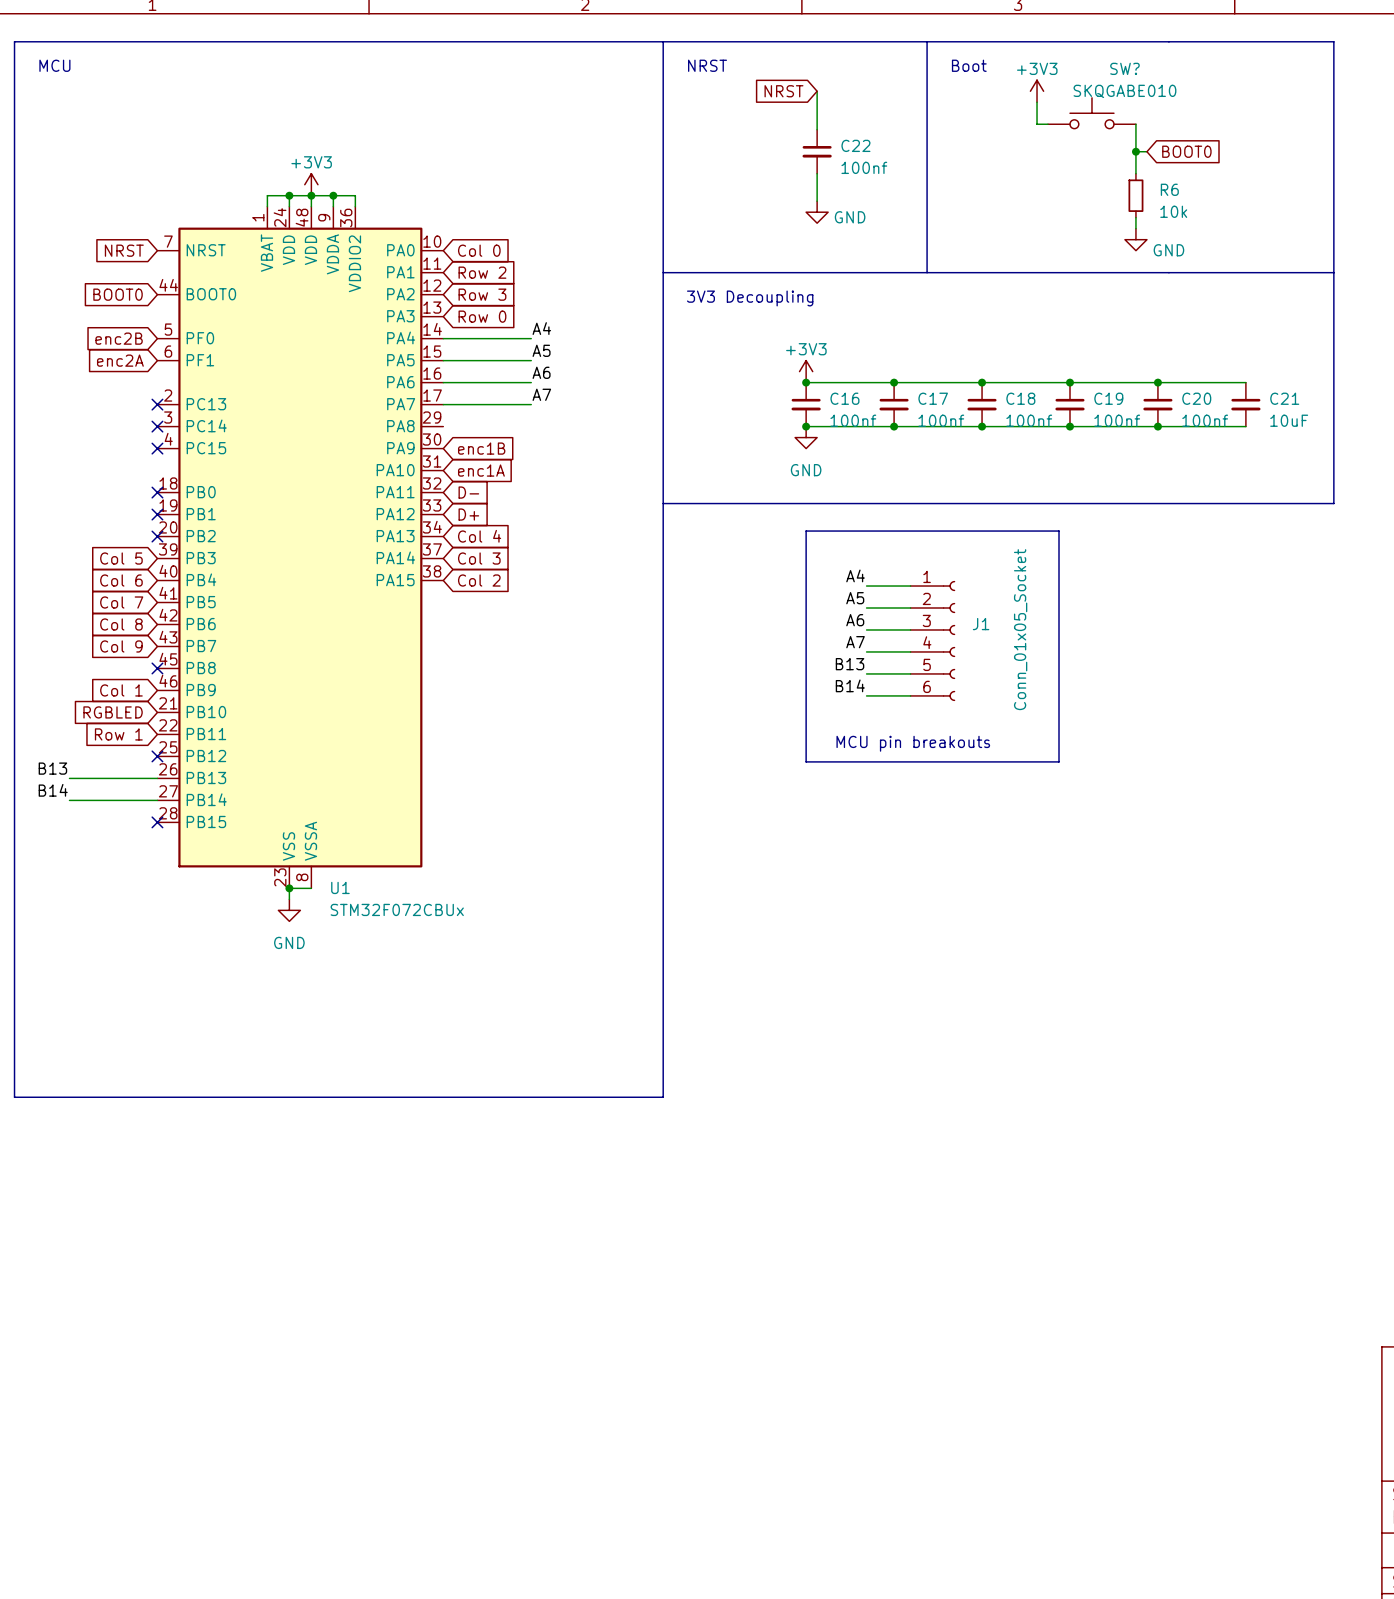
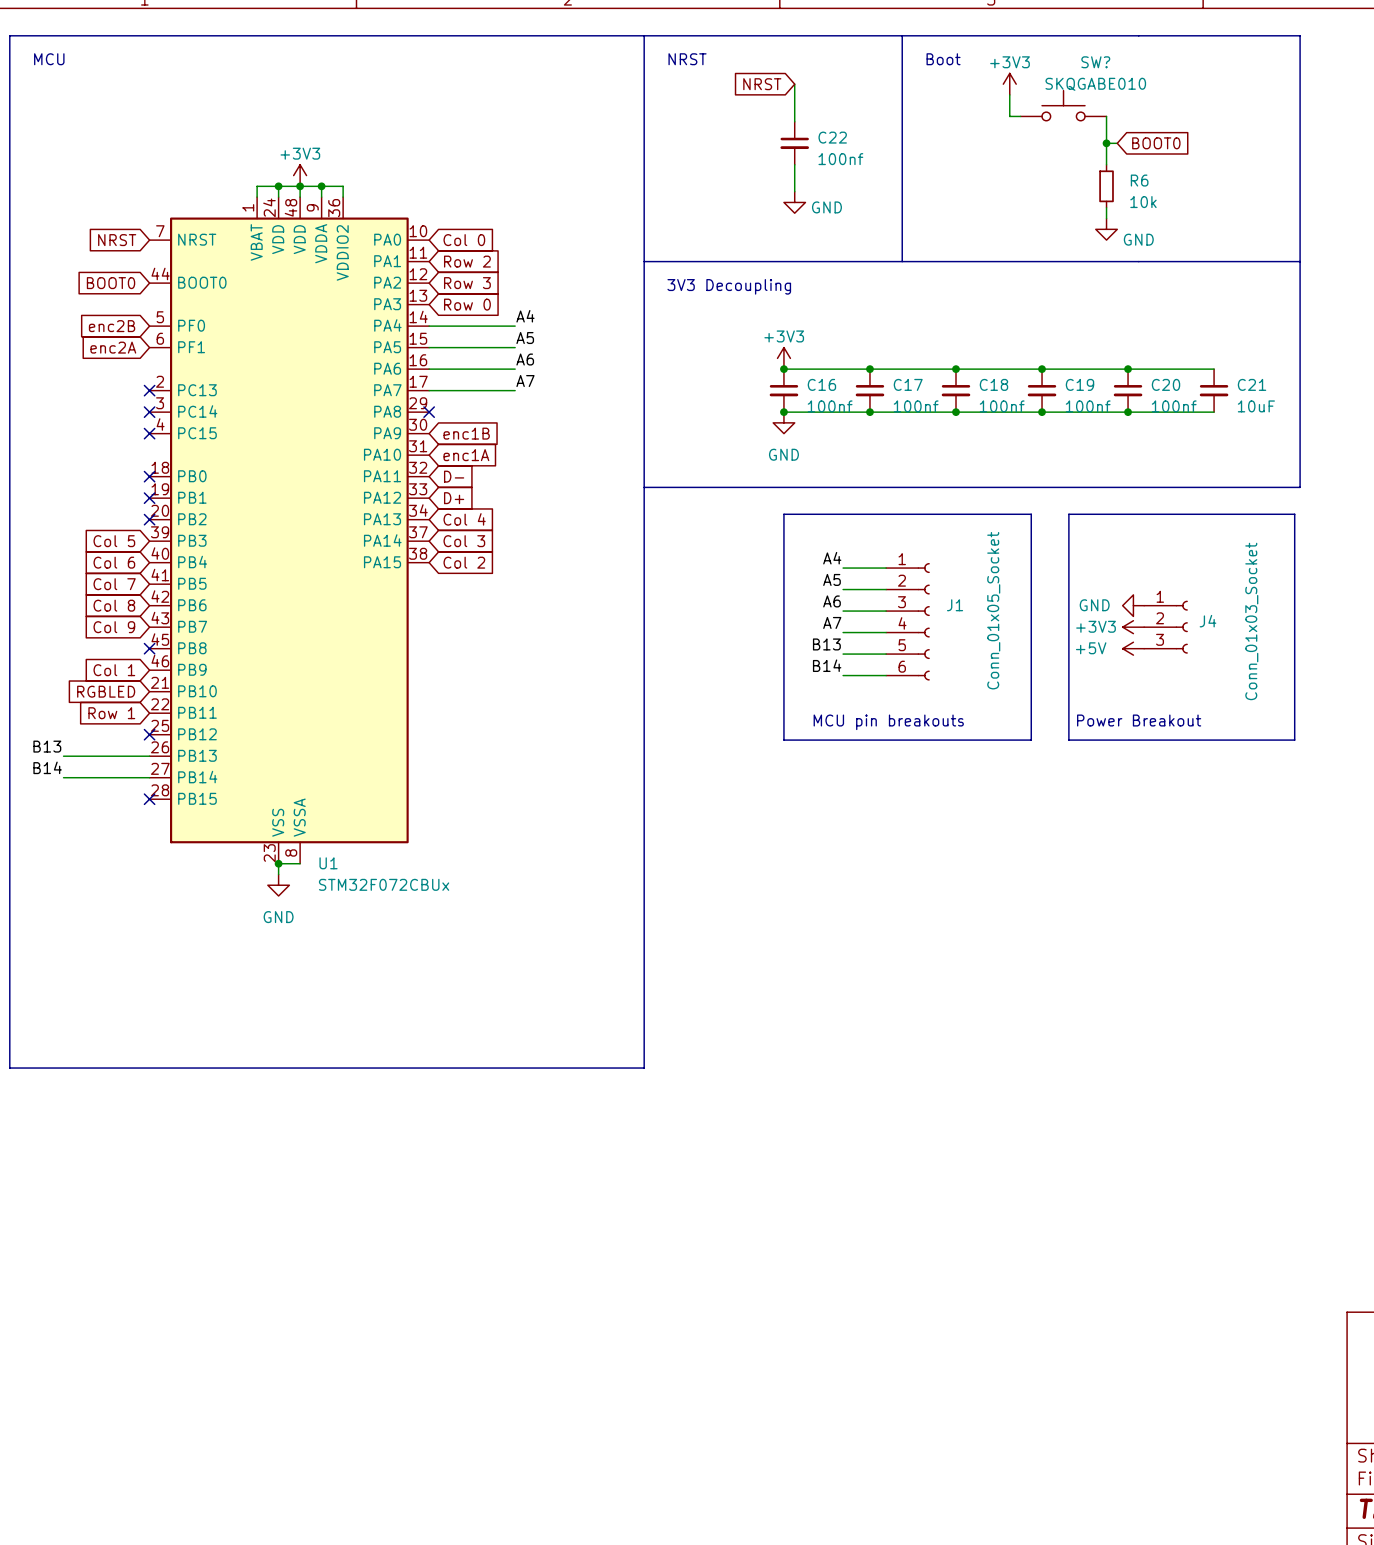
no-connect mark: none -> (429, 412)
line: none -> (1068, 514) (1294, 514) (1294, 740) (1068, 740) (1068, 514)
power symbol: none -> GND (1133, 605)
power symbol: none -> +3V3 (1133, 627)
J4: none -> Conn_01x03_Socket (1165, 627)
power symbol: none -> +5V (1133, 648)
text: none -> Power Breakout (1139, 720)

